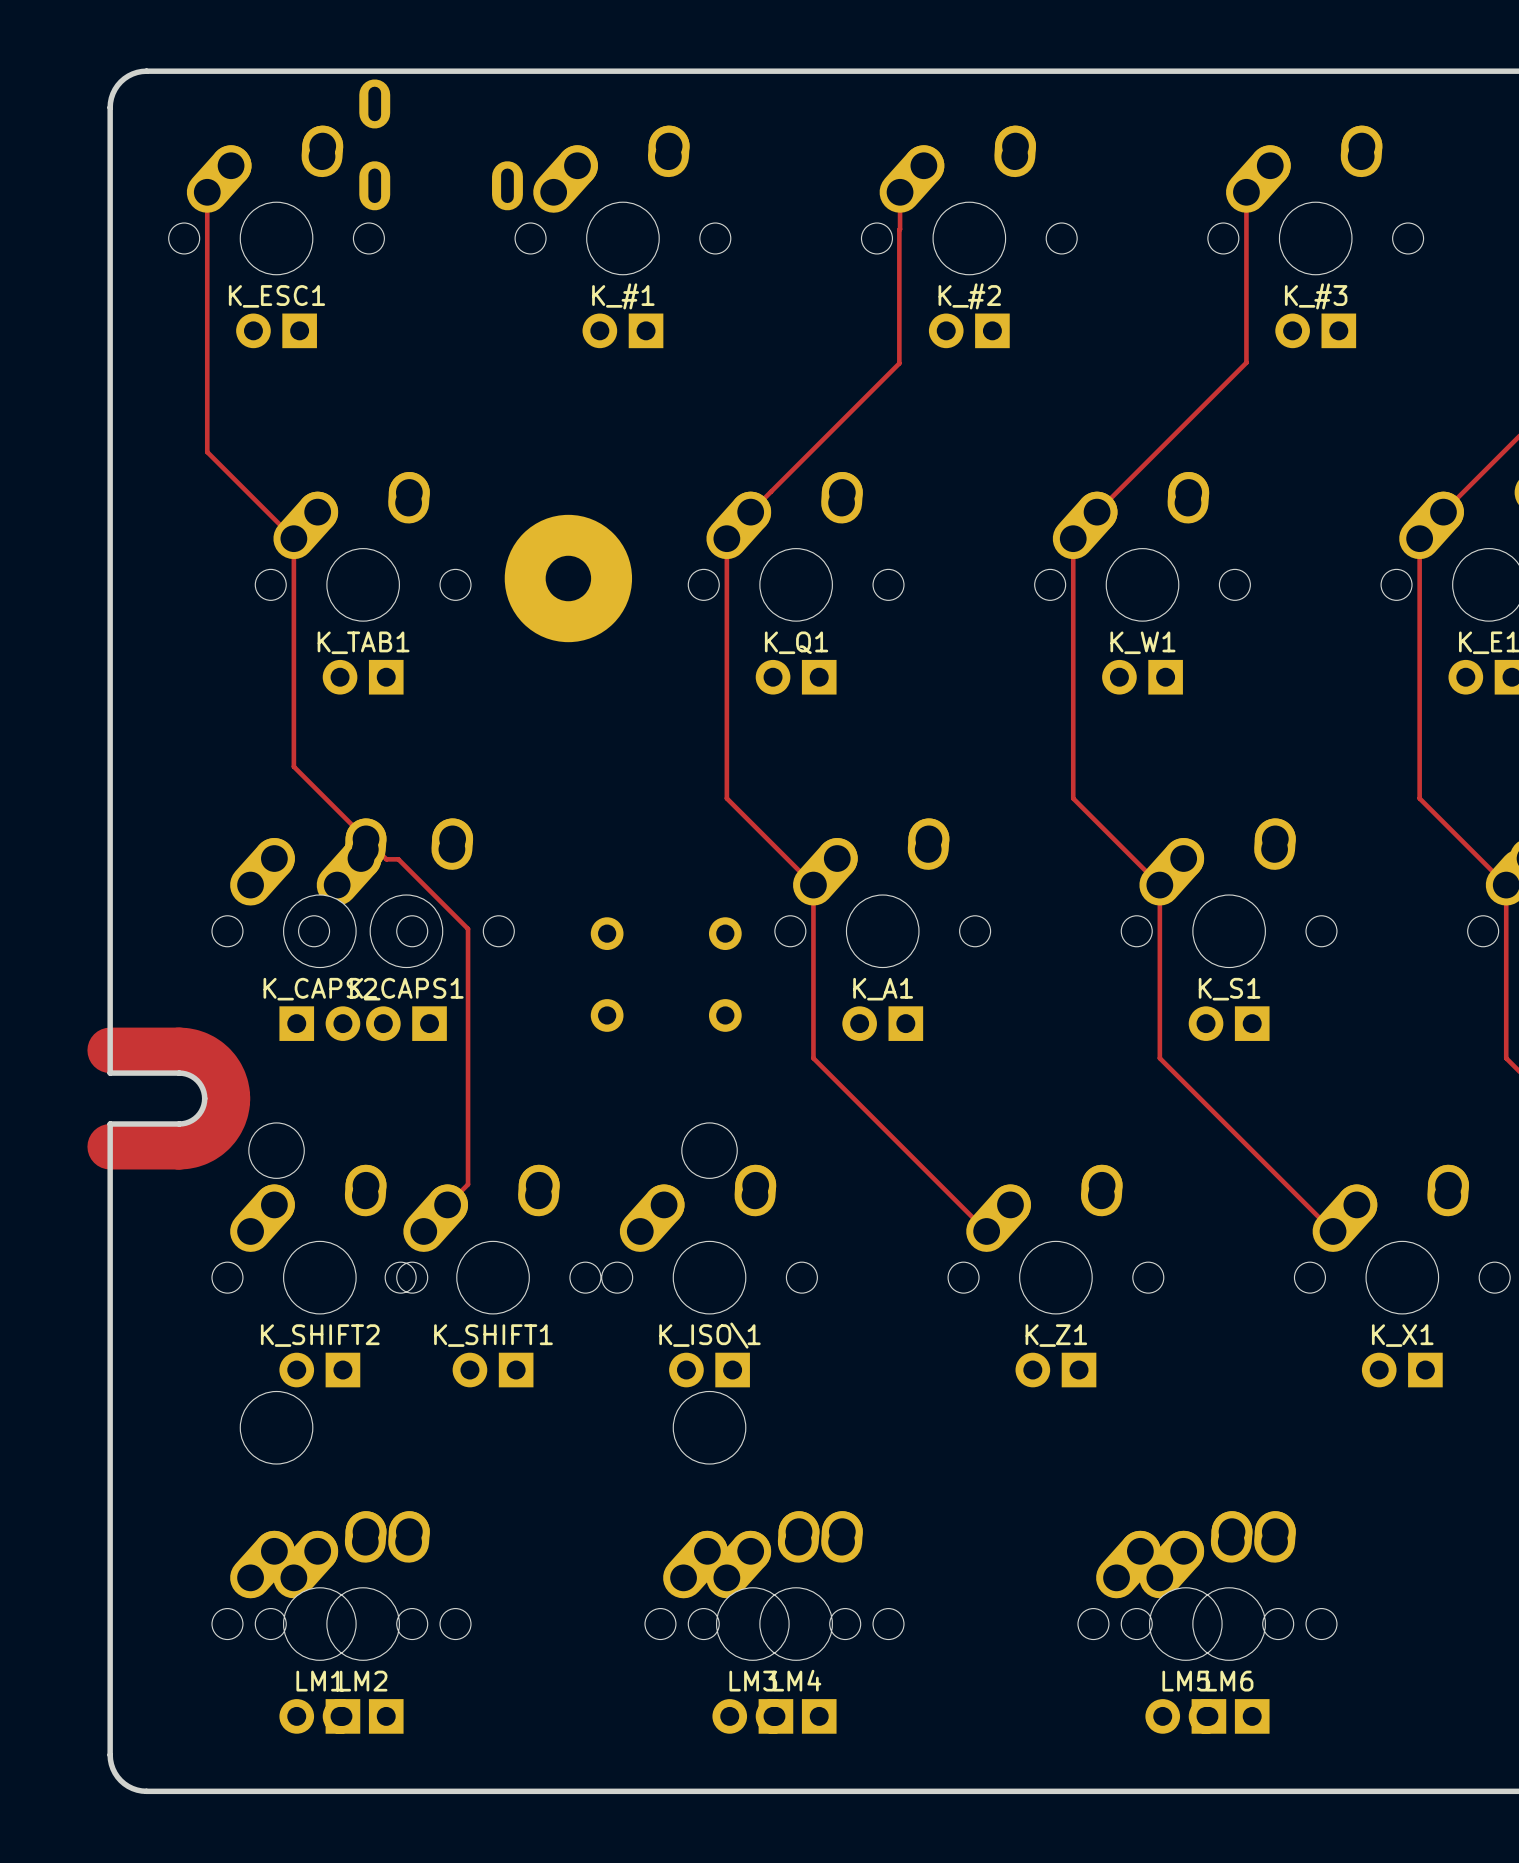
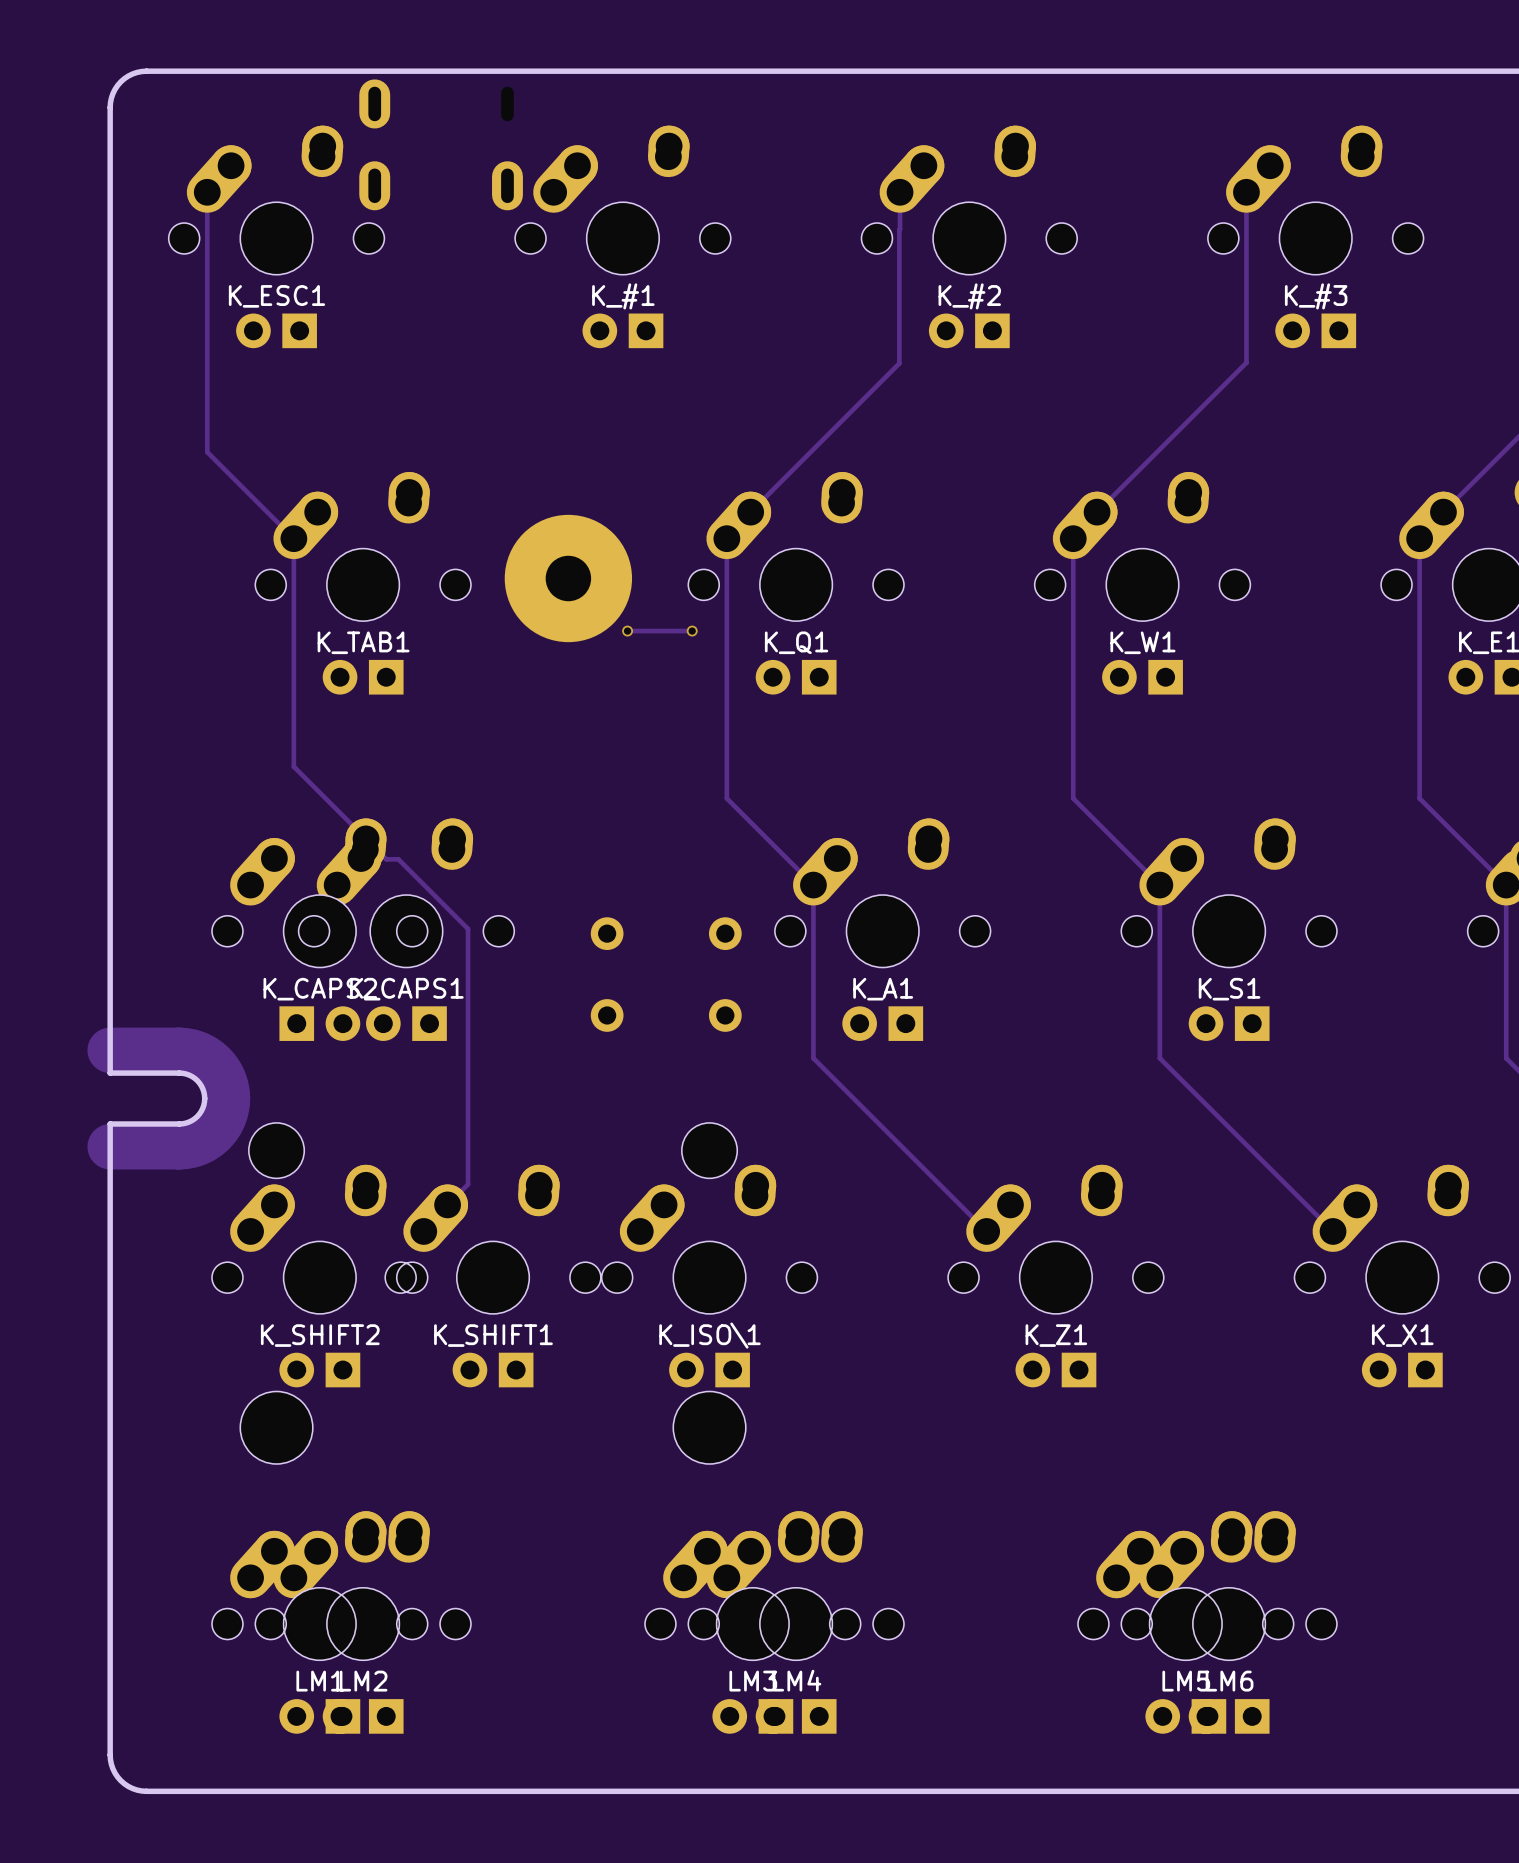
track: none -> (627, 631) (692, 631)
via: none -> (627, 631)
via: none -> (692, 631)

